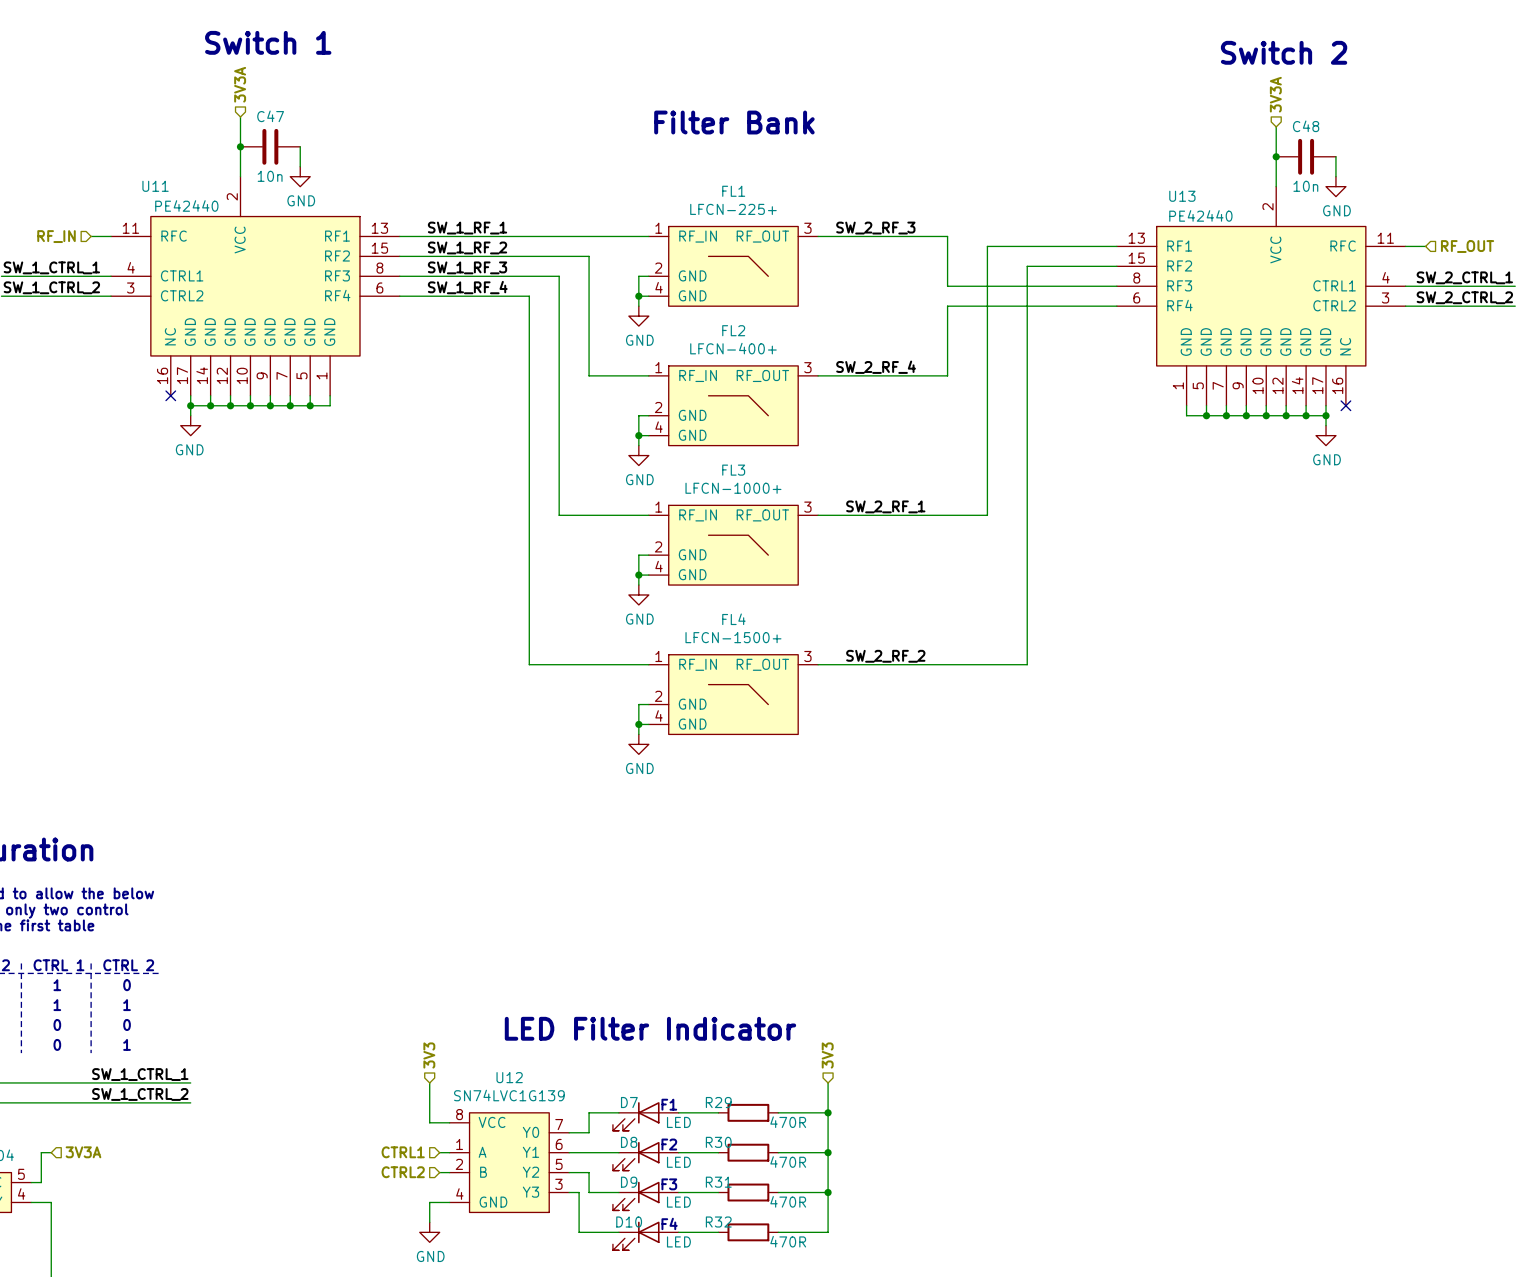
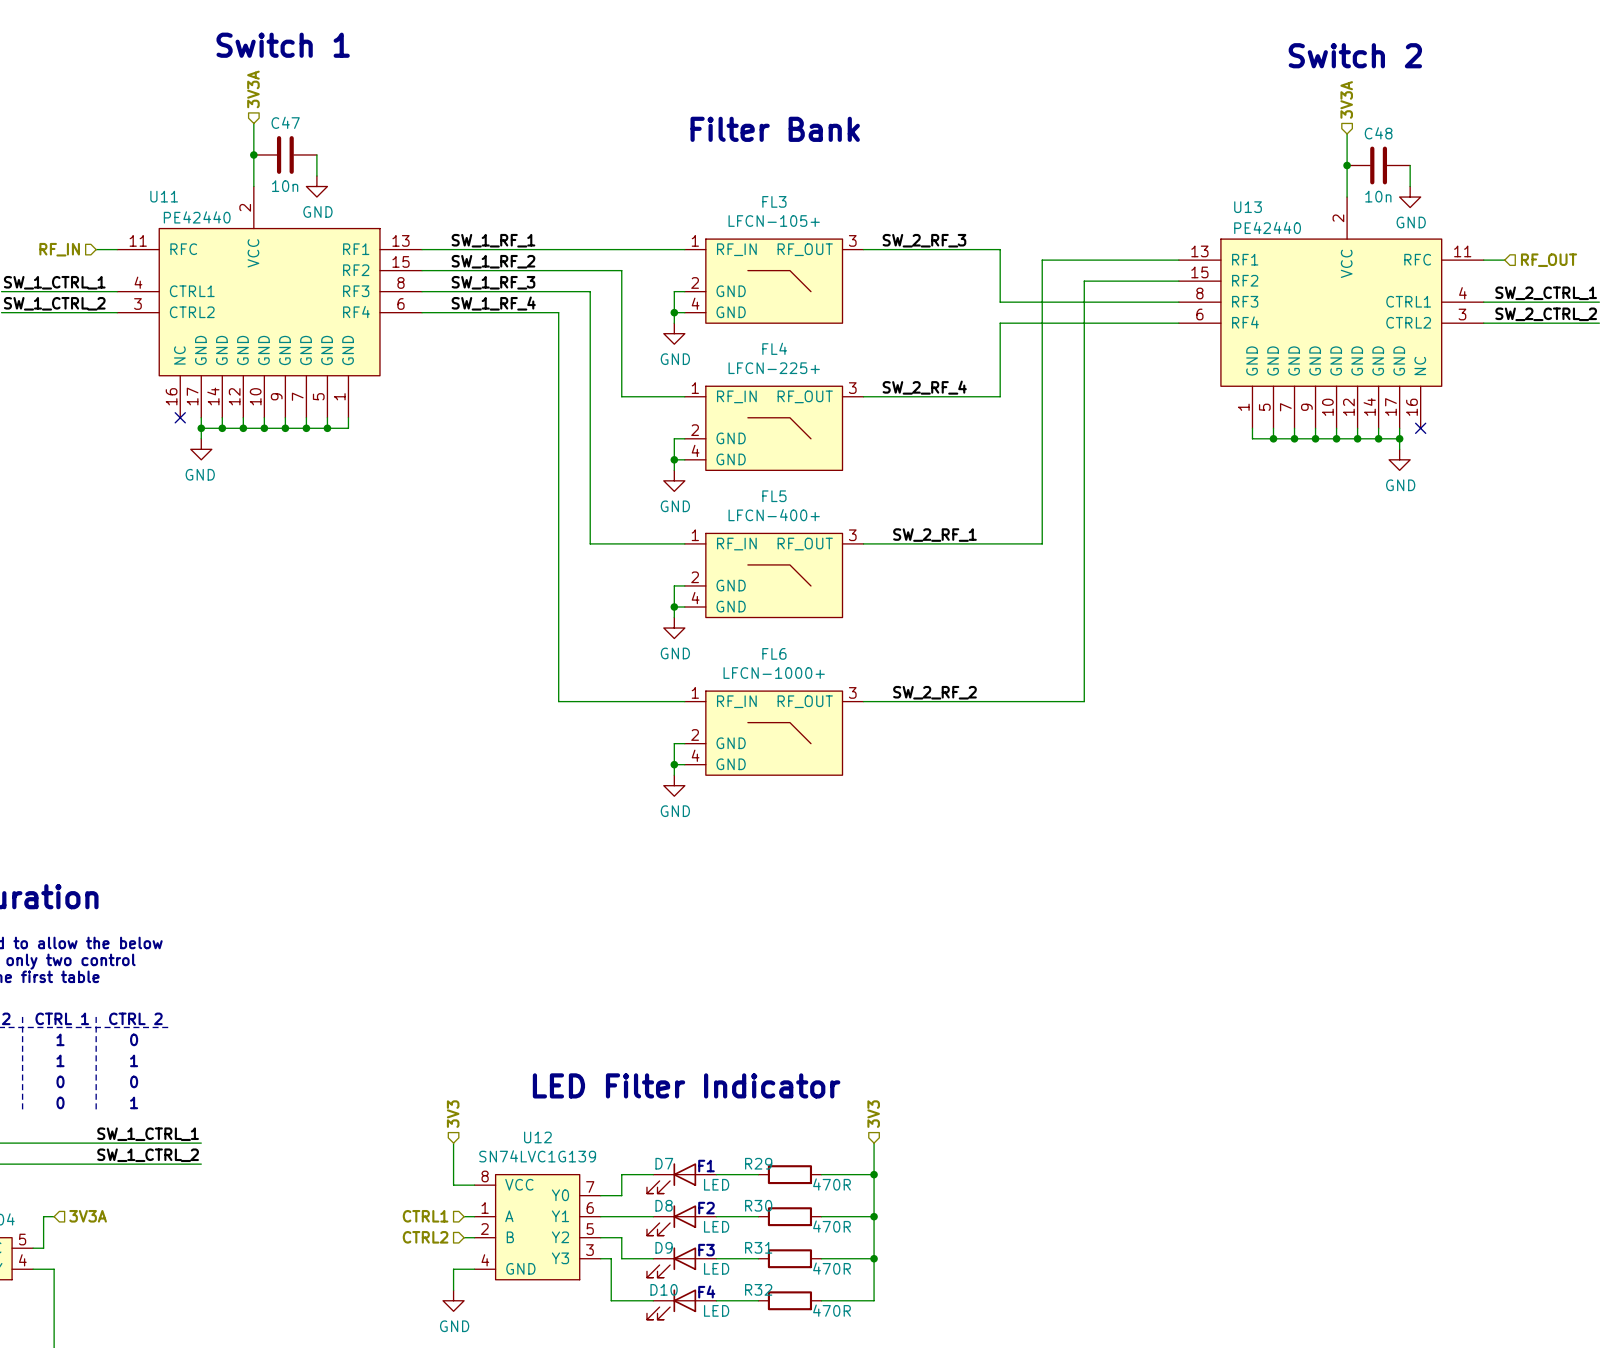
FL1 name: FL1 (733, 191) -> FL3 (774, 201)
FL1 value: LFCN-225+ (733, 209) -> LFCN-105+ (774, 221)
FL2 name: FL2 (733, 330) -> FL4 (774, 348)
FL2 value: LFCN-400+ (733, 348) -> LFCN-225+ (774, 368)
FL3 name: FL3 (733, 470) -> FL5 (774, 496)
FL3 value: LFCN-1000+ (733, 488) -> LFCN-400+ (774, 515)
FL4 name: FL4 (733, 619) -> FL6 (774, 653)
FL4 value: LFCN-1500+ (733, 637) -> LFCN-1000+ (774, 673)

